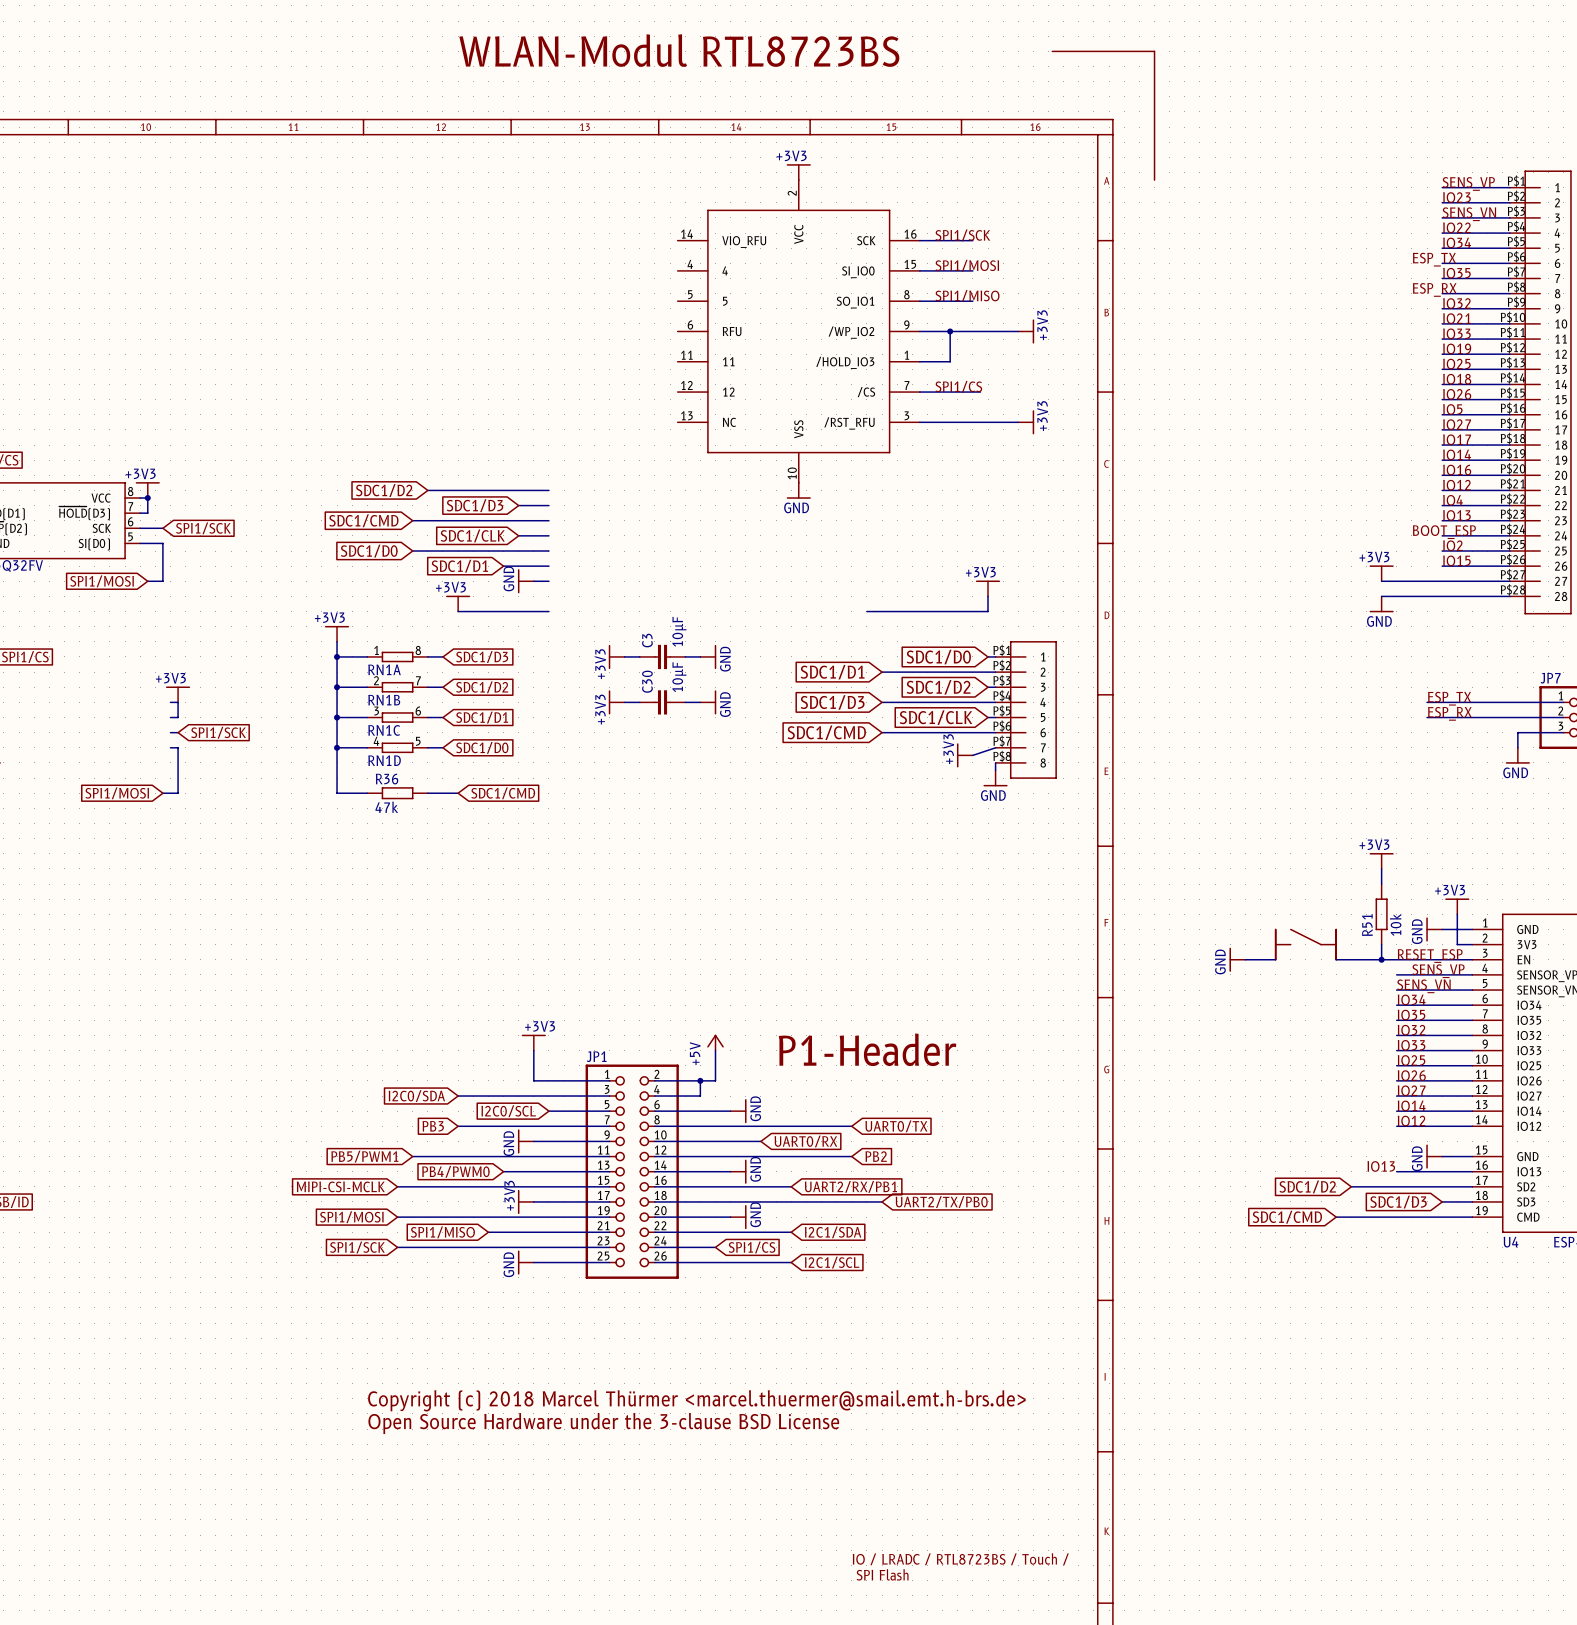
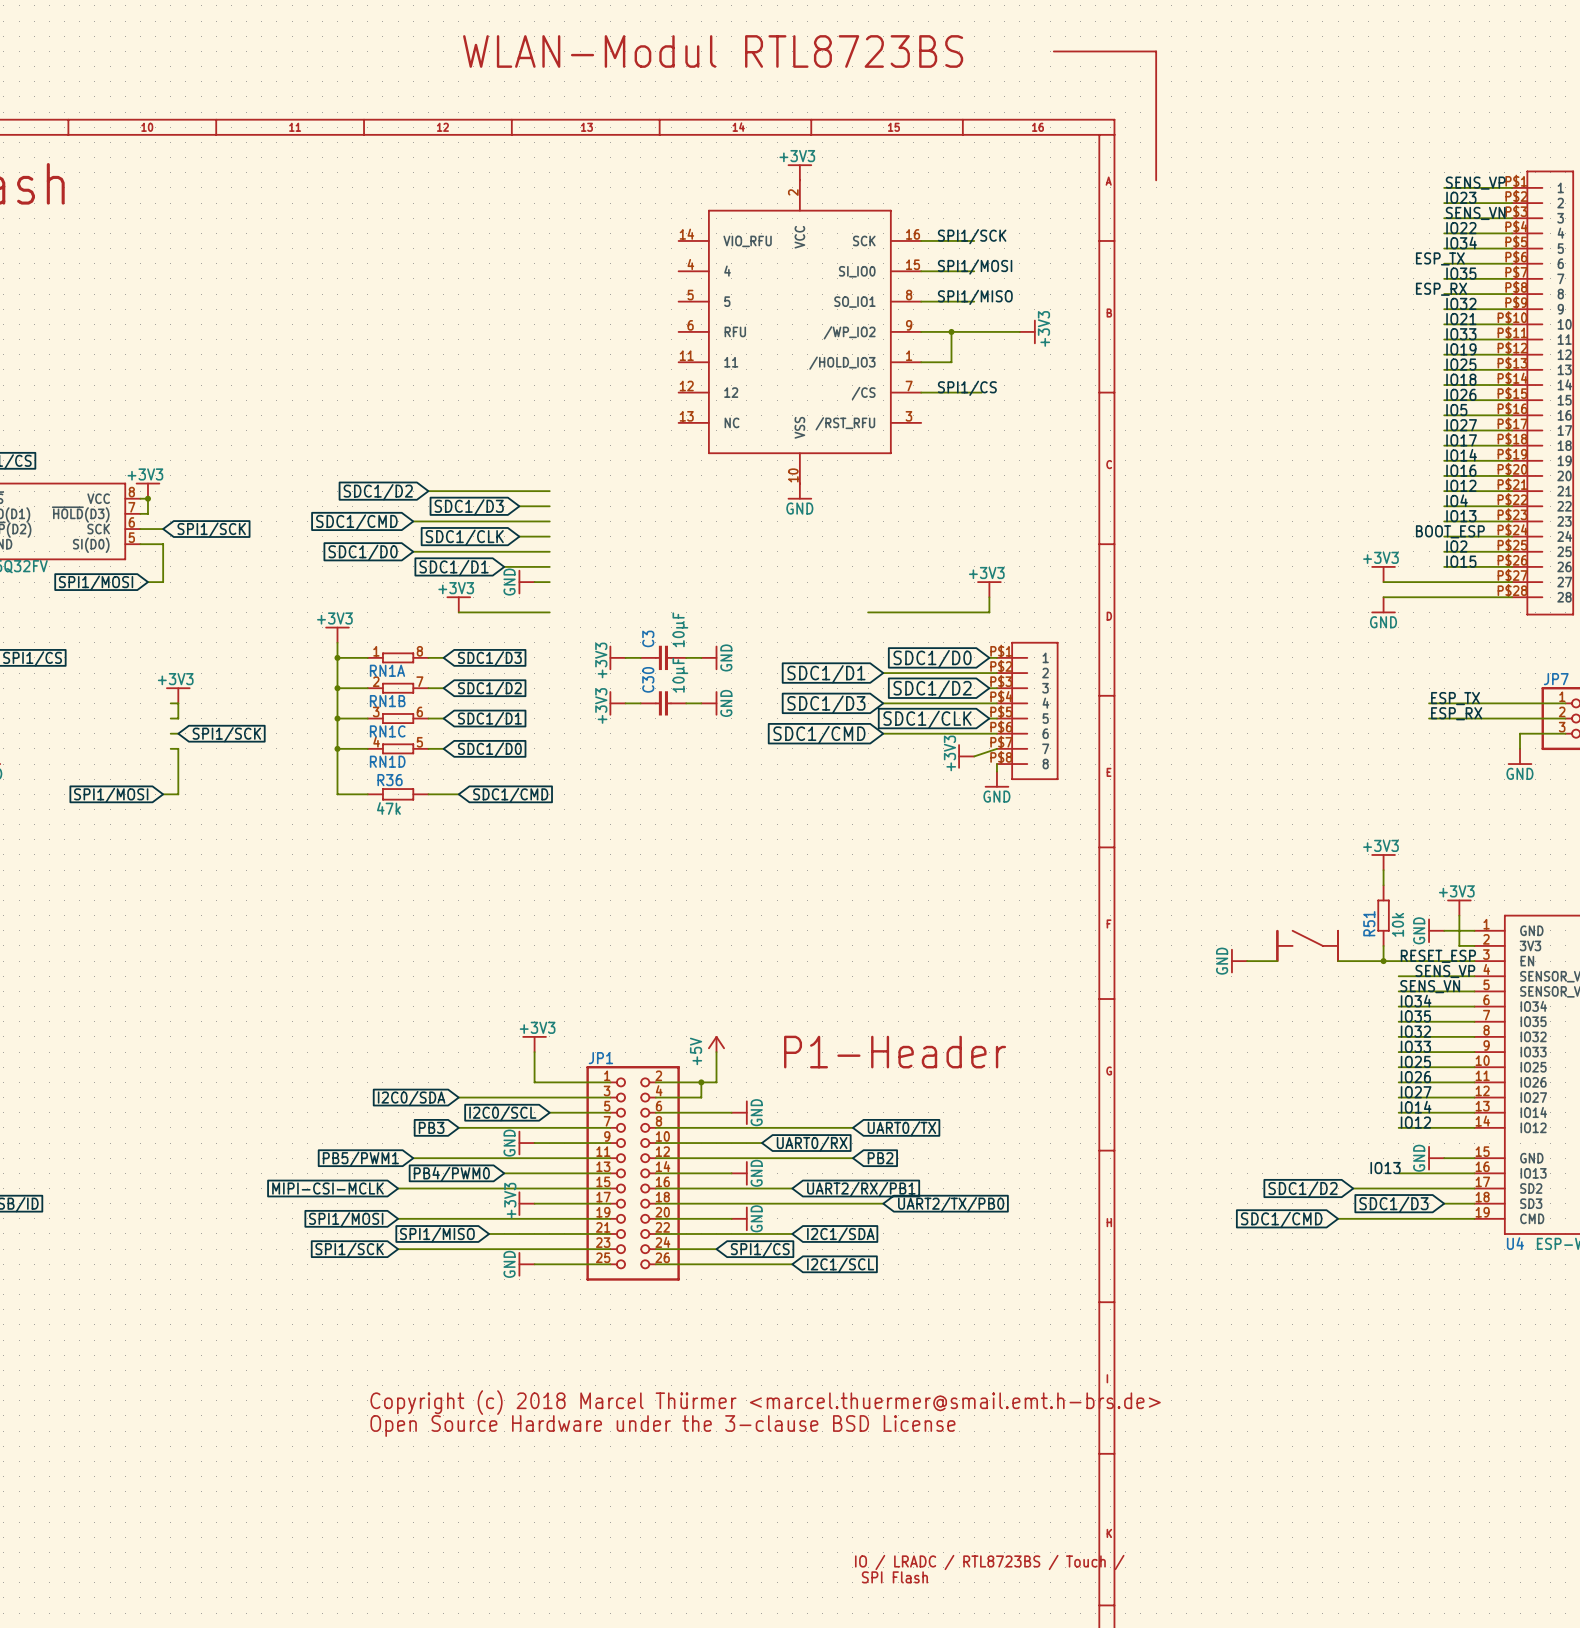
wire: (919, 422) (1018, 422) -> none
power symbol: +3V3 (1026, 422) -> none

